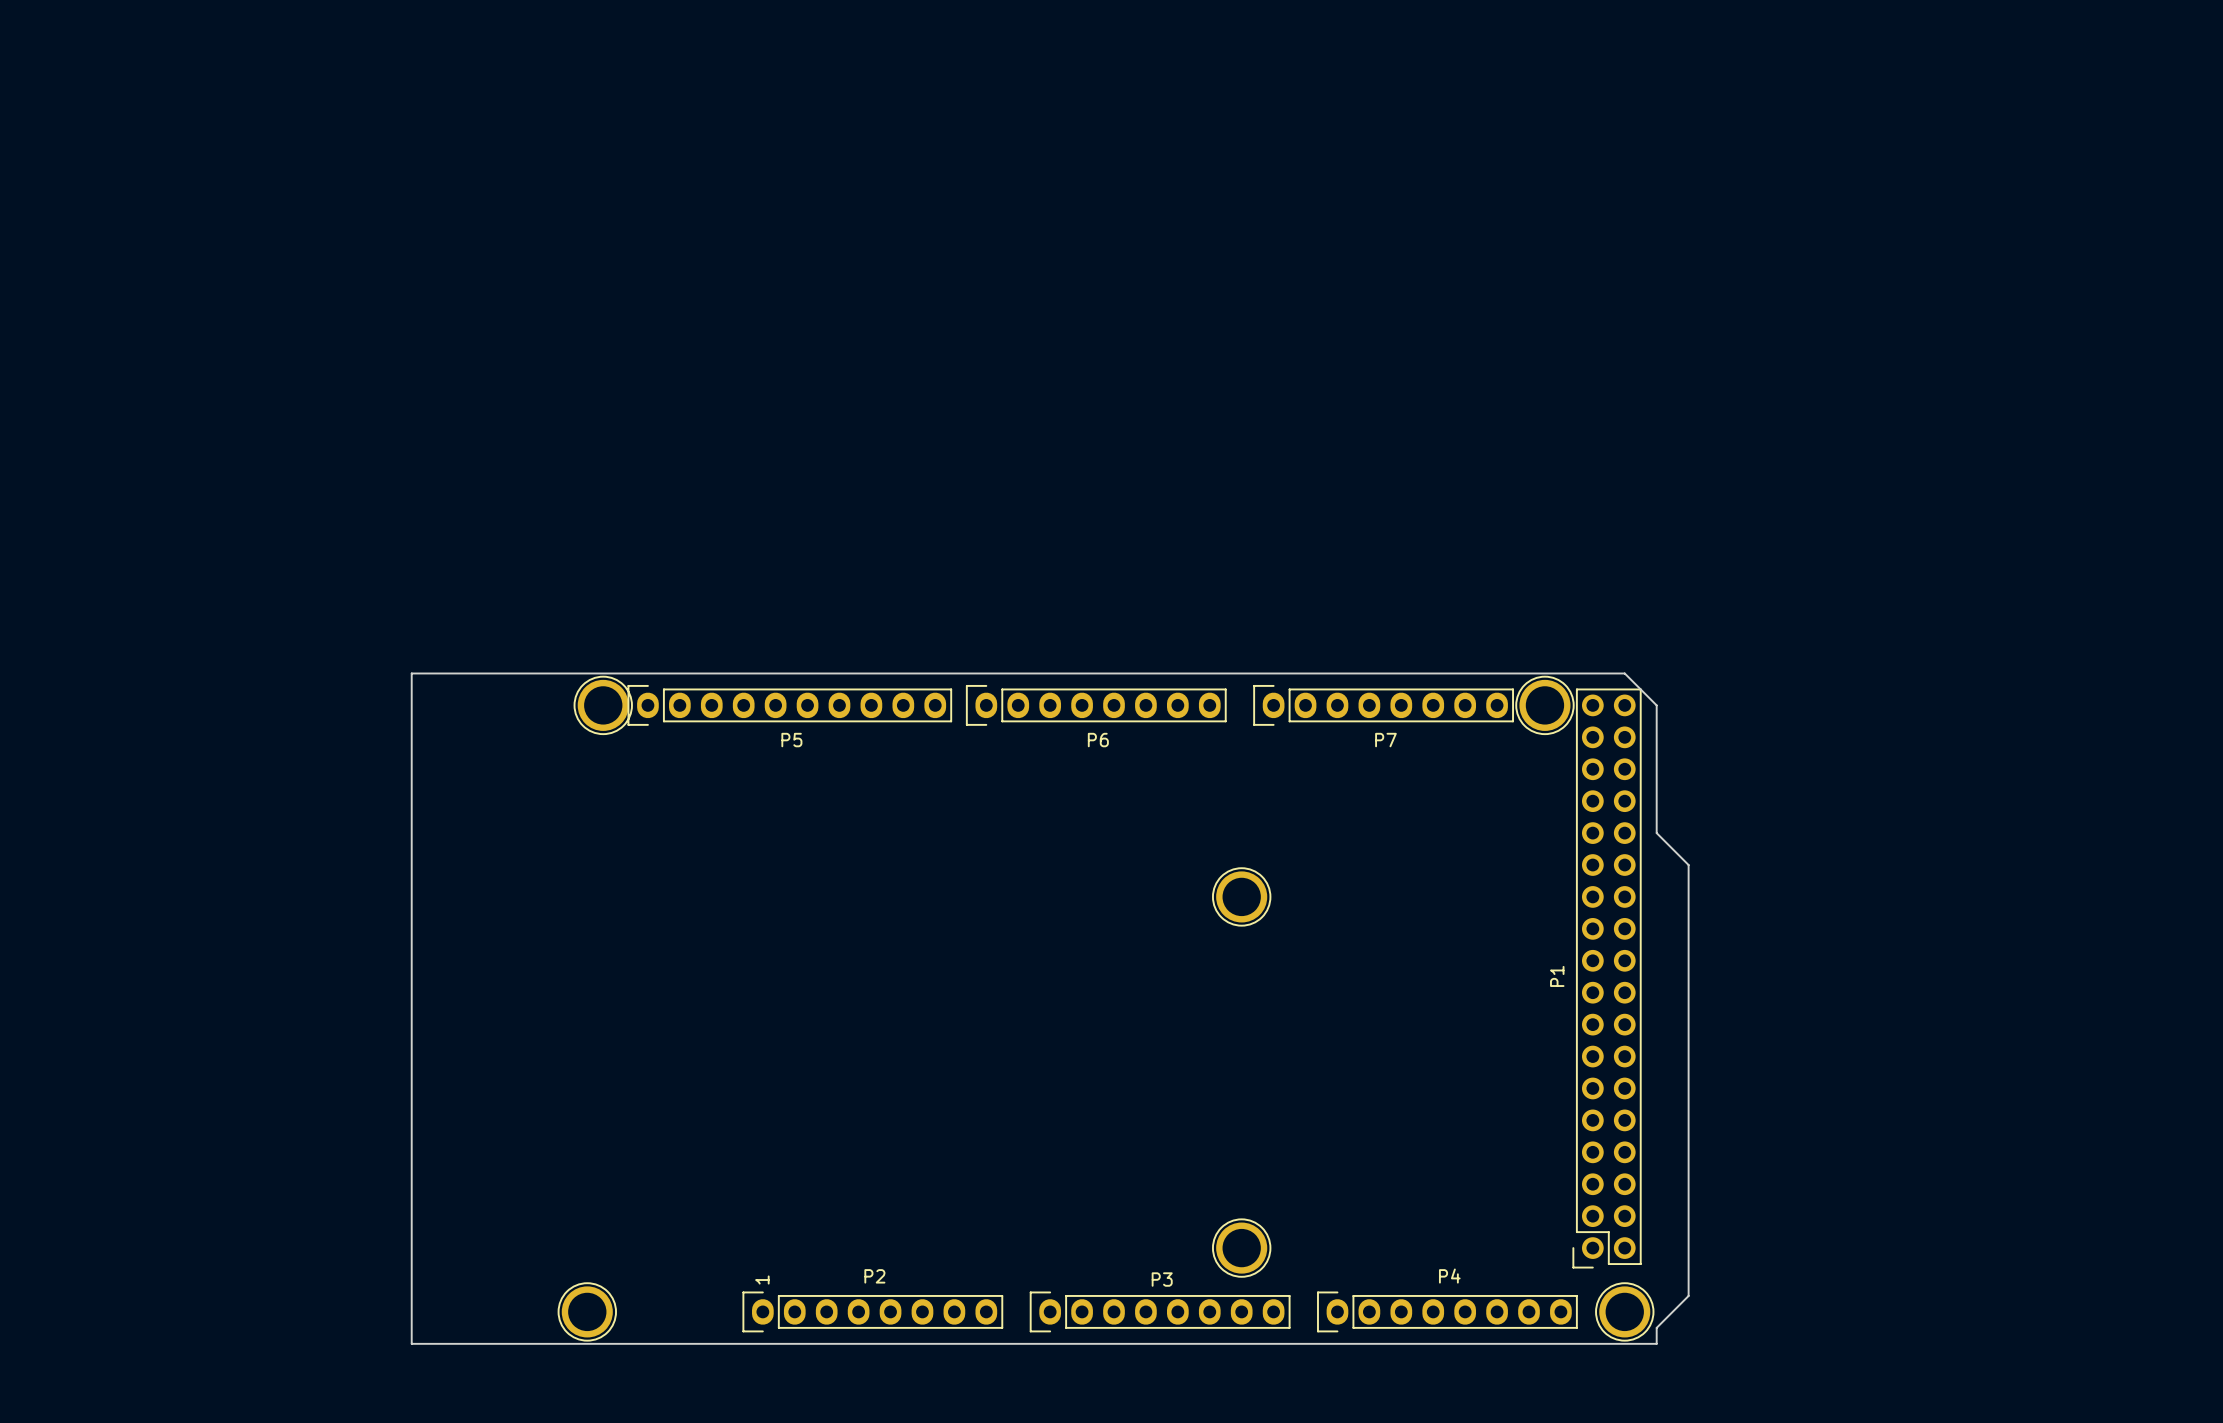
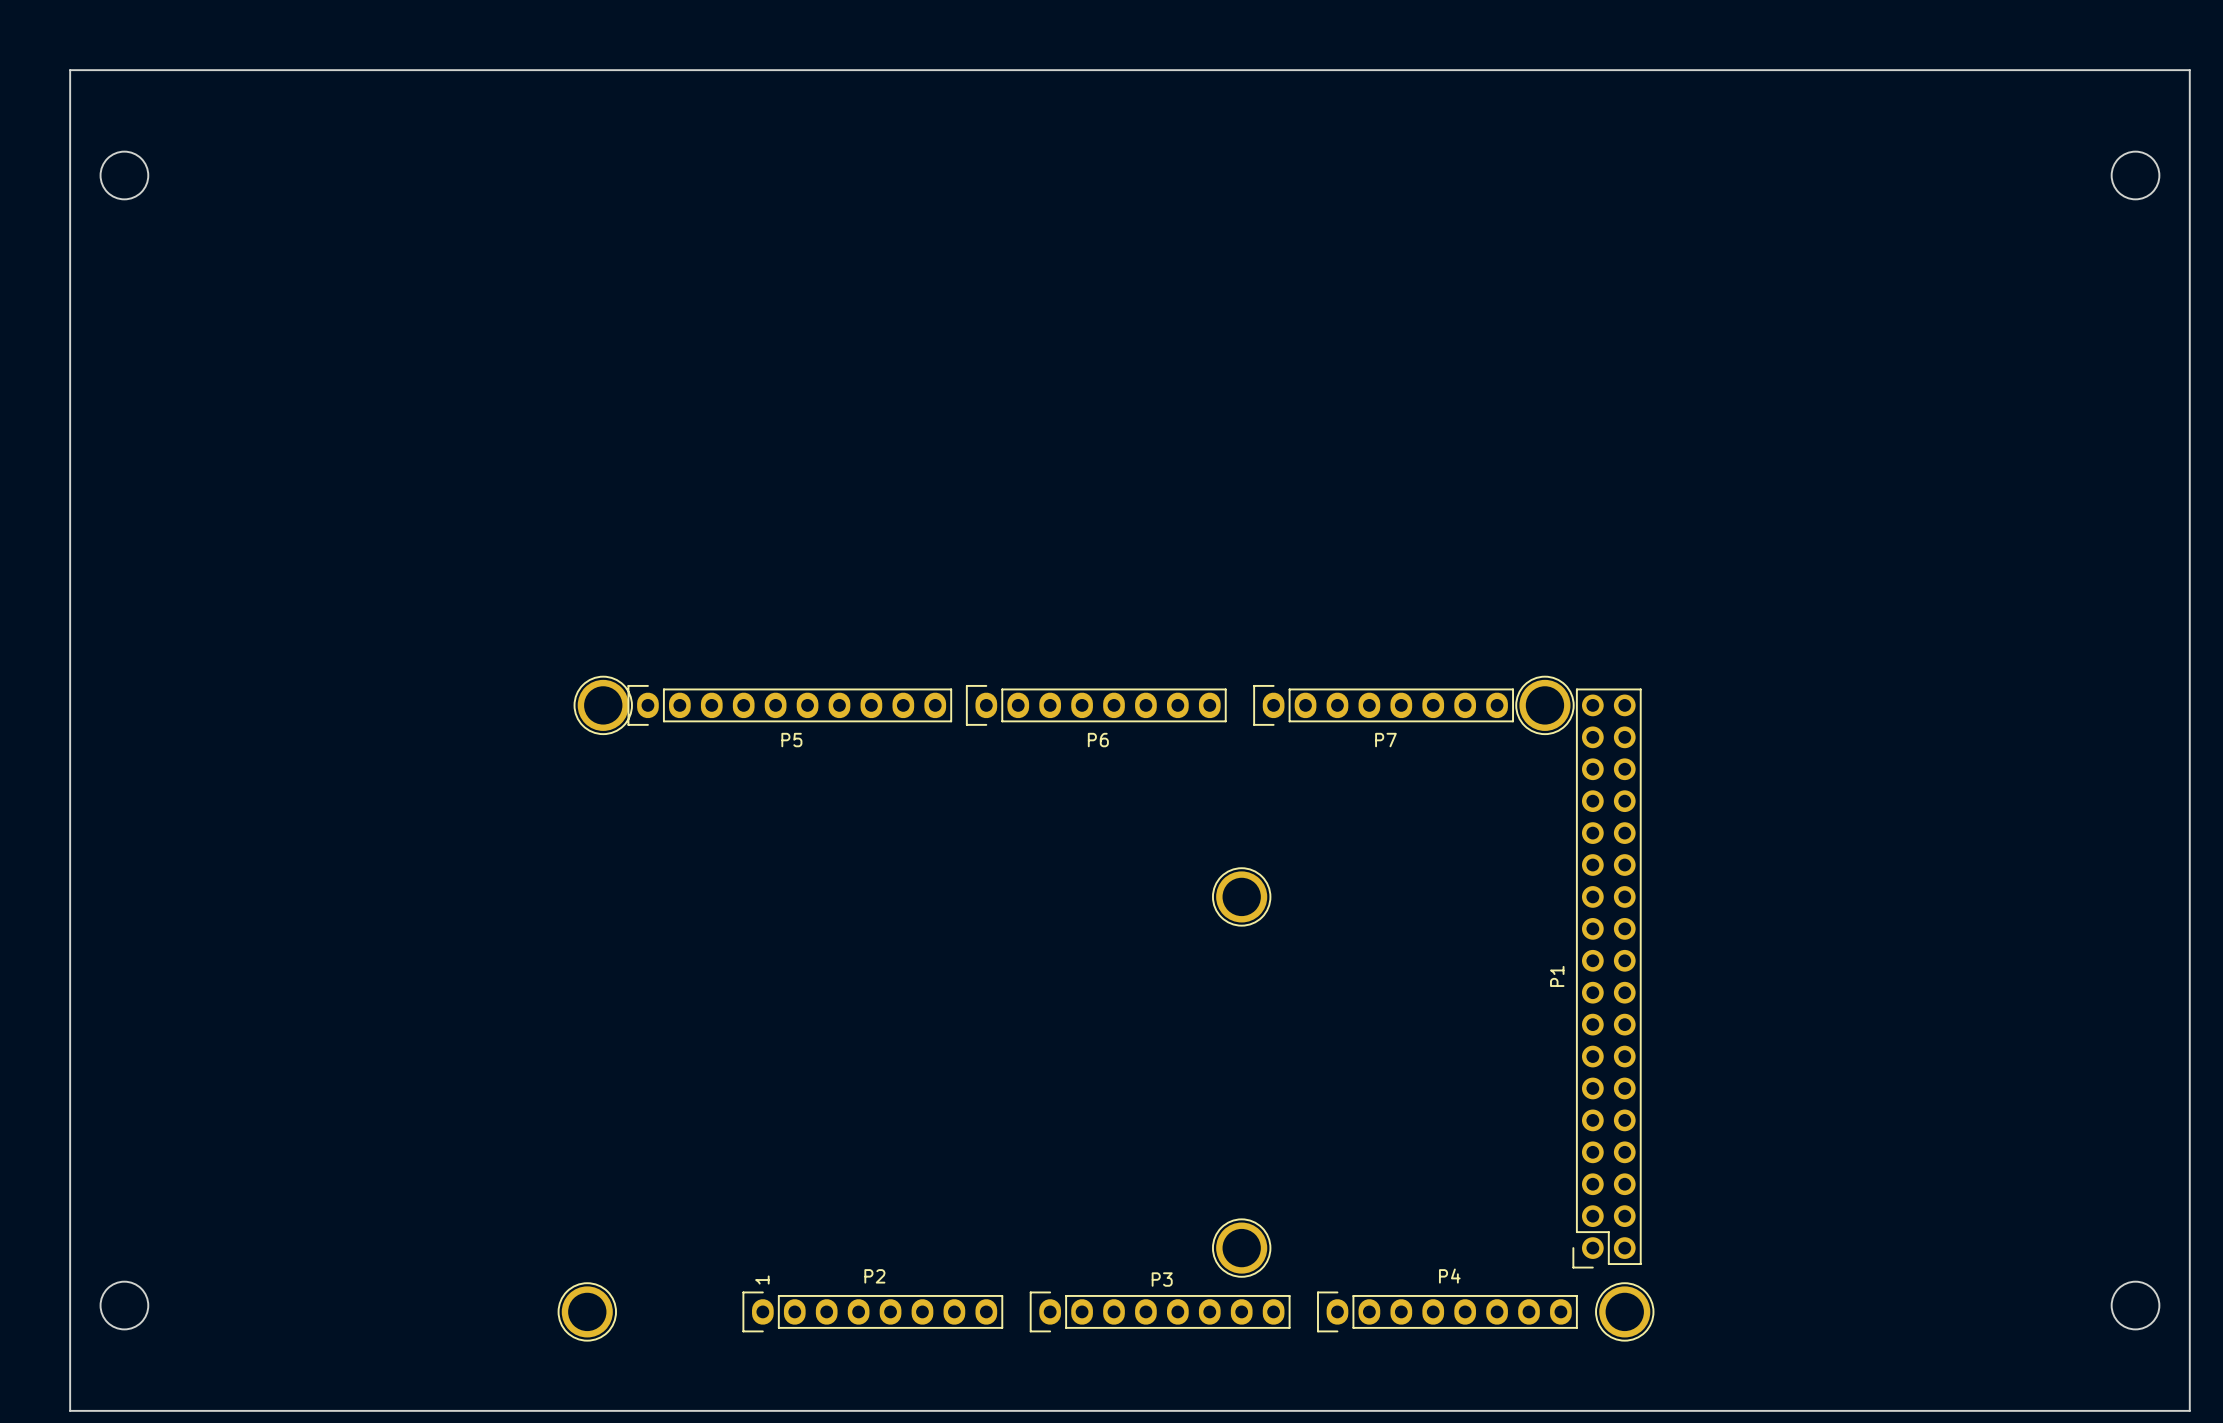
board edge: none -> (70, 70) (2189, 70) (2189, 1410) (70, 1410) (70, 70)
round board edge: none -> [99, 150, 150, 201]
round board edge: none -> [2110, 150, 2161, 201]
board edge: (411, 673) (1624, 673) (1656, 705) (1656, 833) (1688, 865) (1688, 1295) (1656, 1327) (1656, 1343) (411, 1343) (411, 673) -> none
round board edge: none -> [99, 1280, 150, 1331]
round board edge: none -> [2110, 1280, 2161, 1331]

